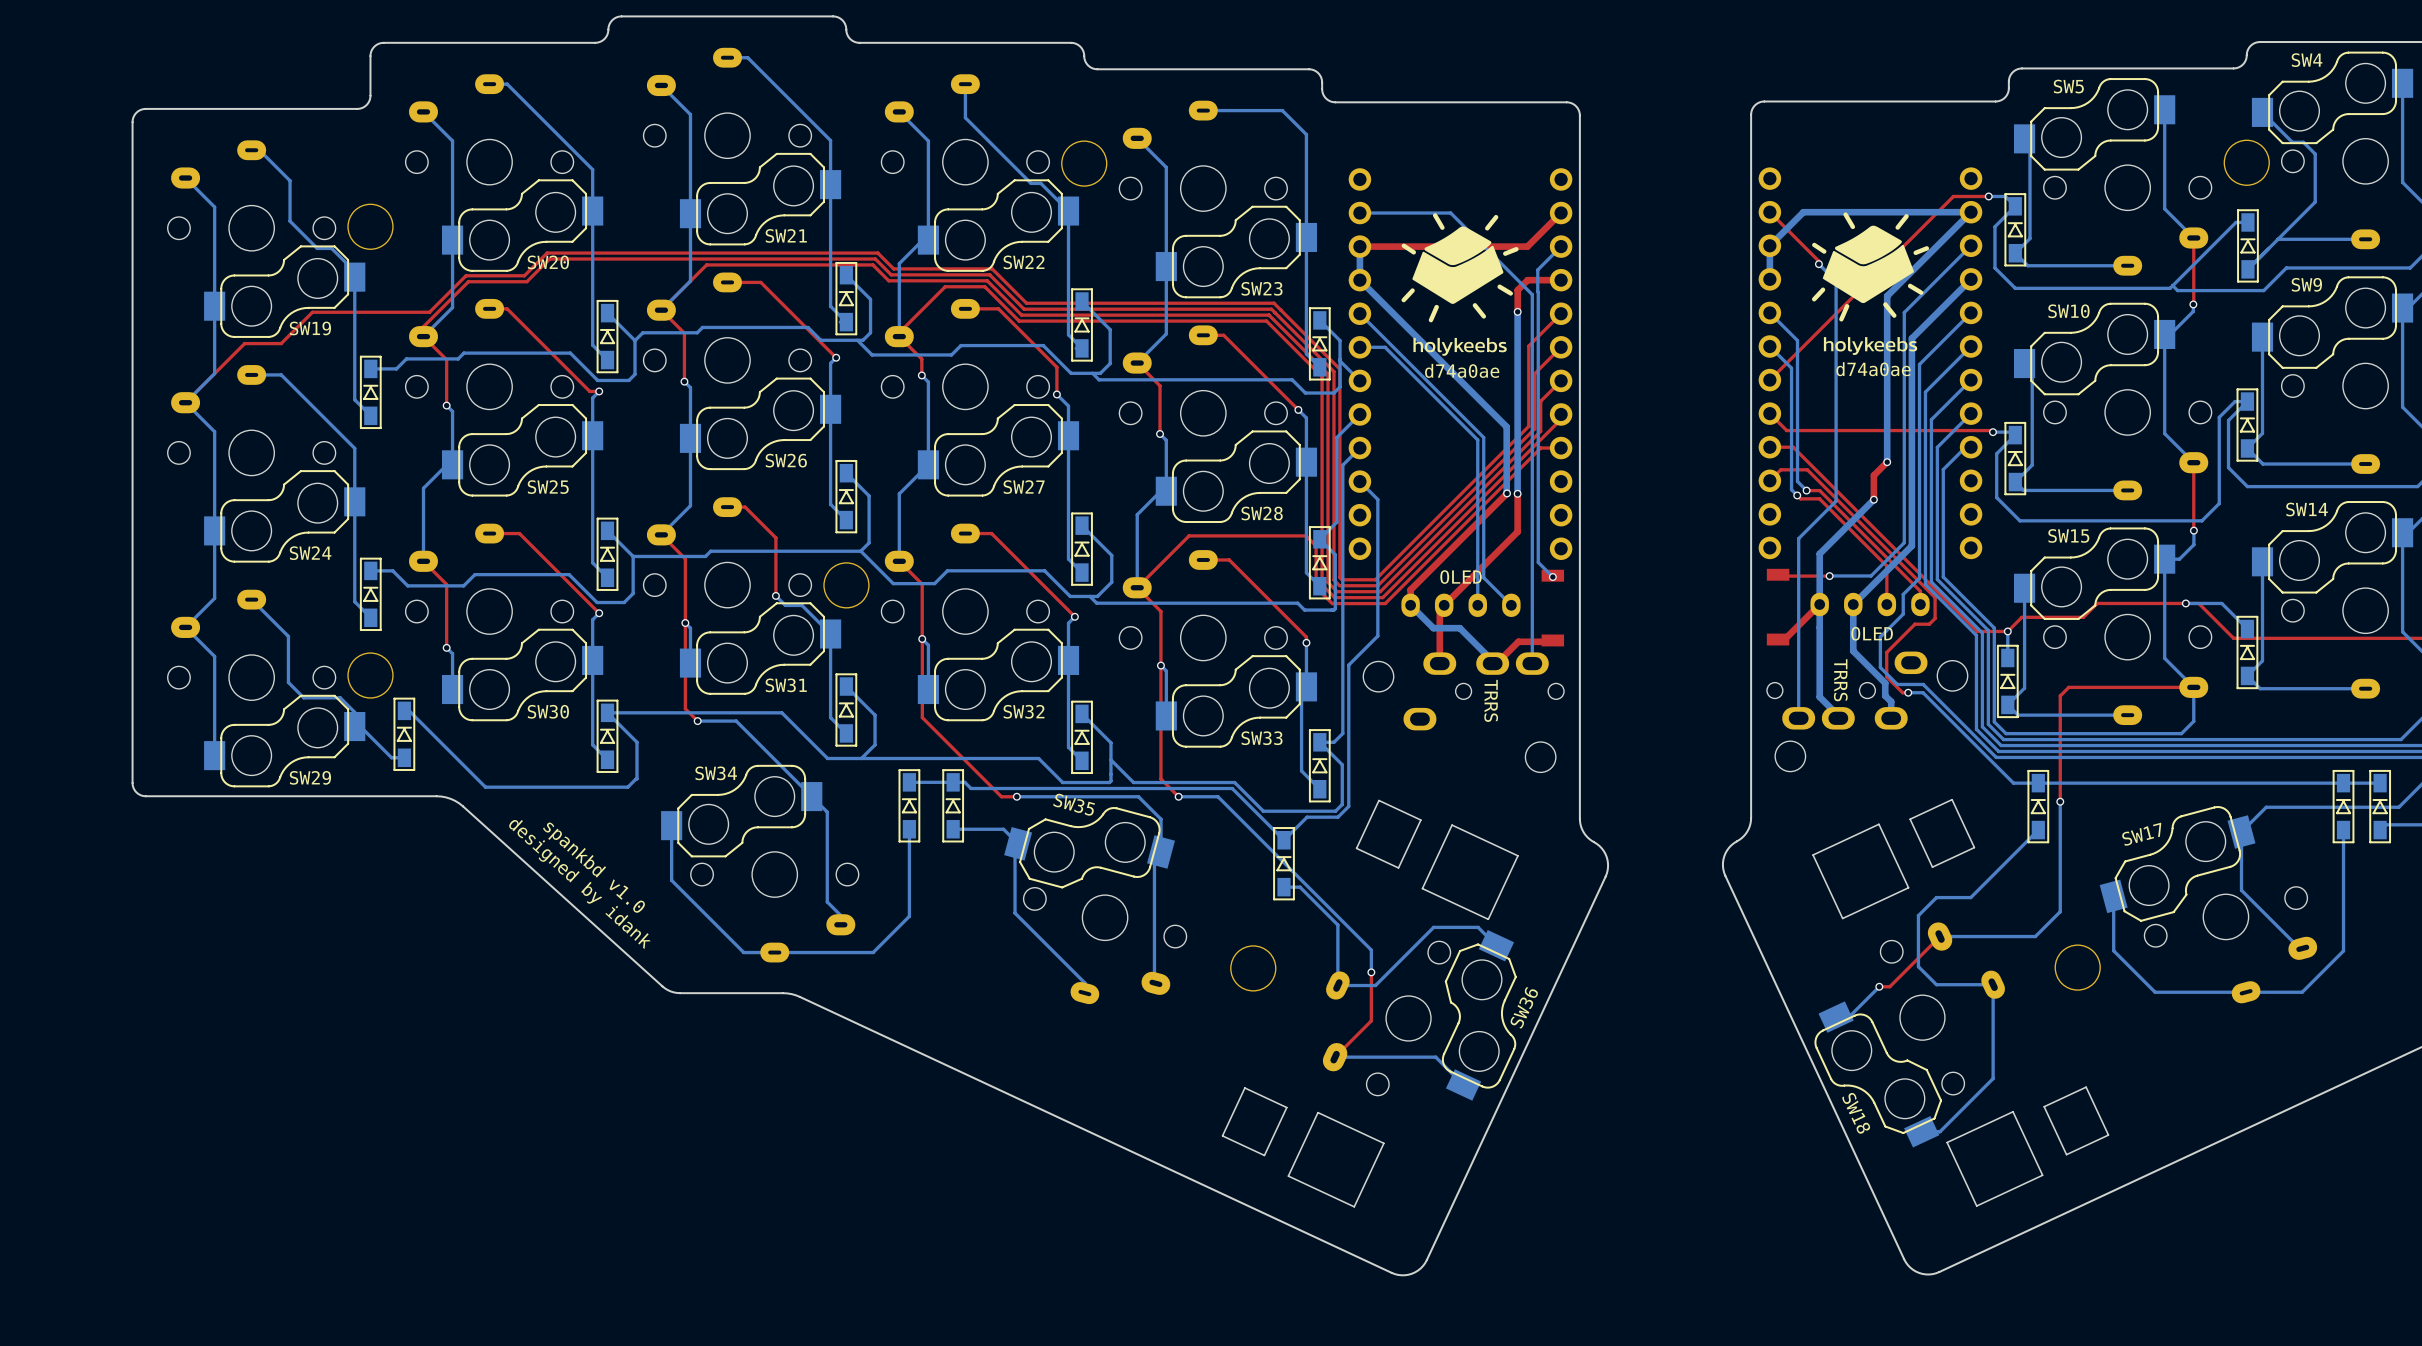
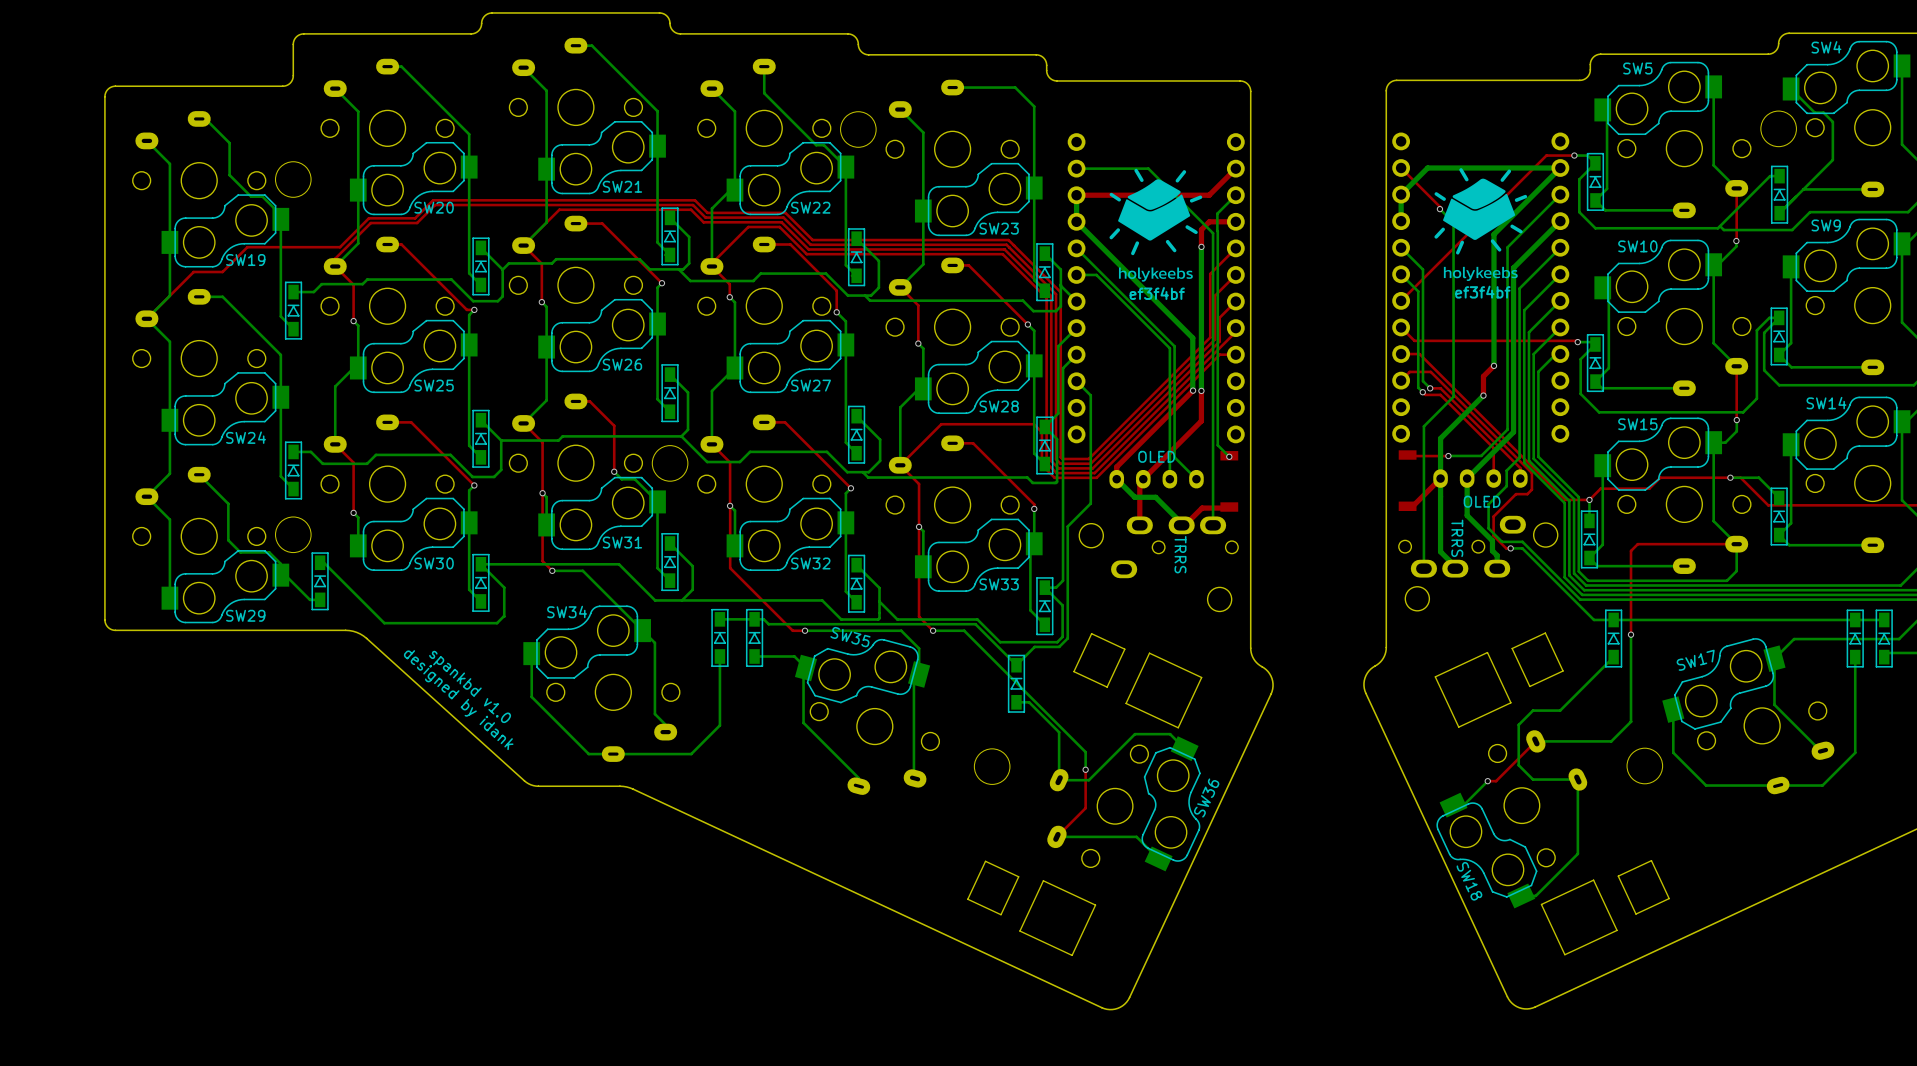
text: d74a0ae (1873, 369) -> ef3f4bf (1482, 292)
text: d74a0ae (1462, 370) -> ef3f4bf (1157, 293)

